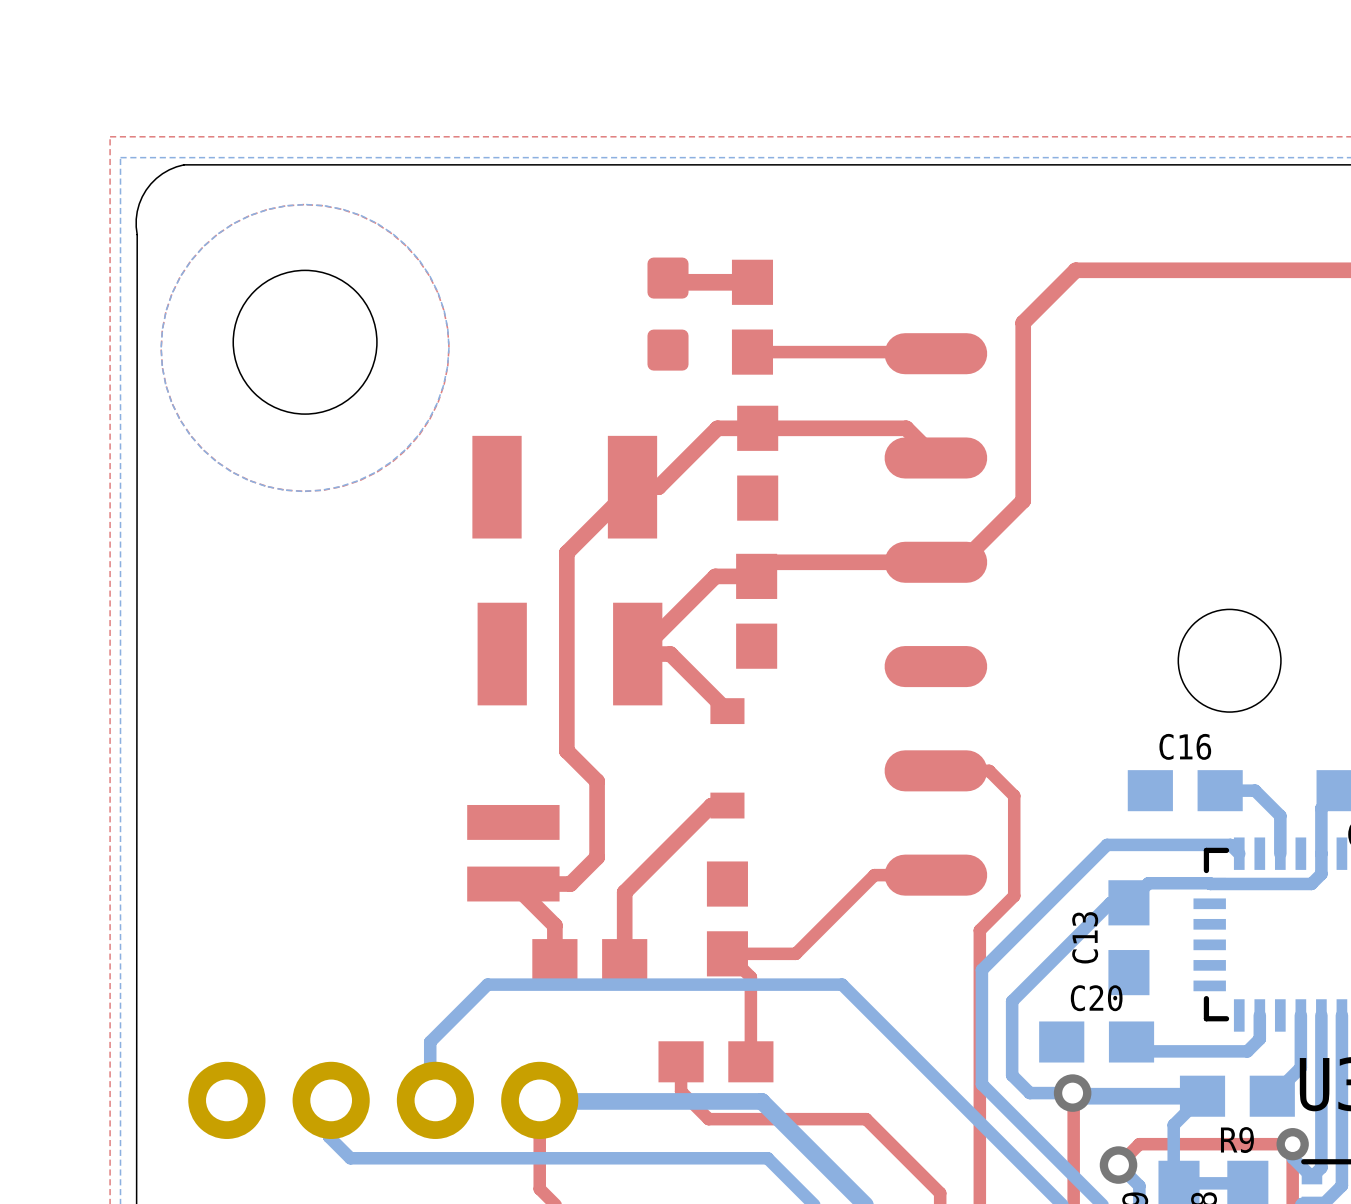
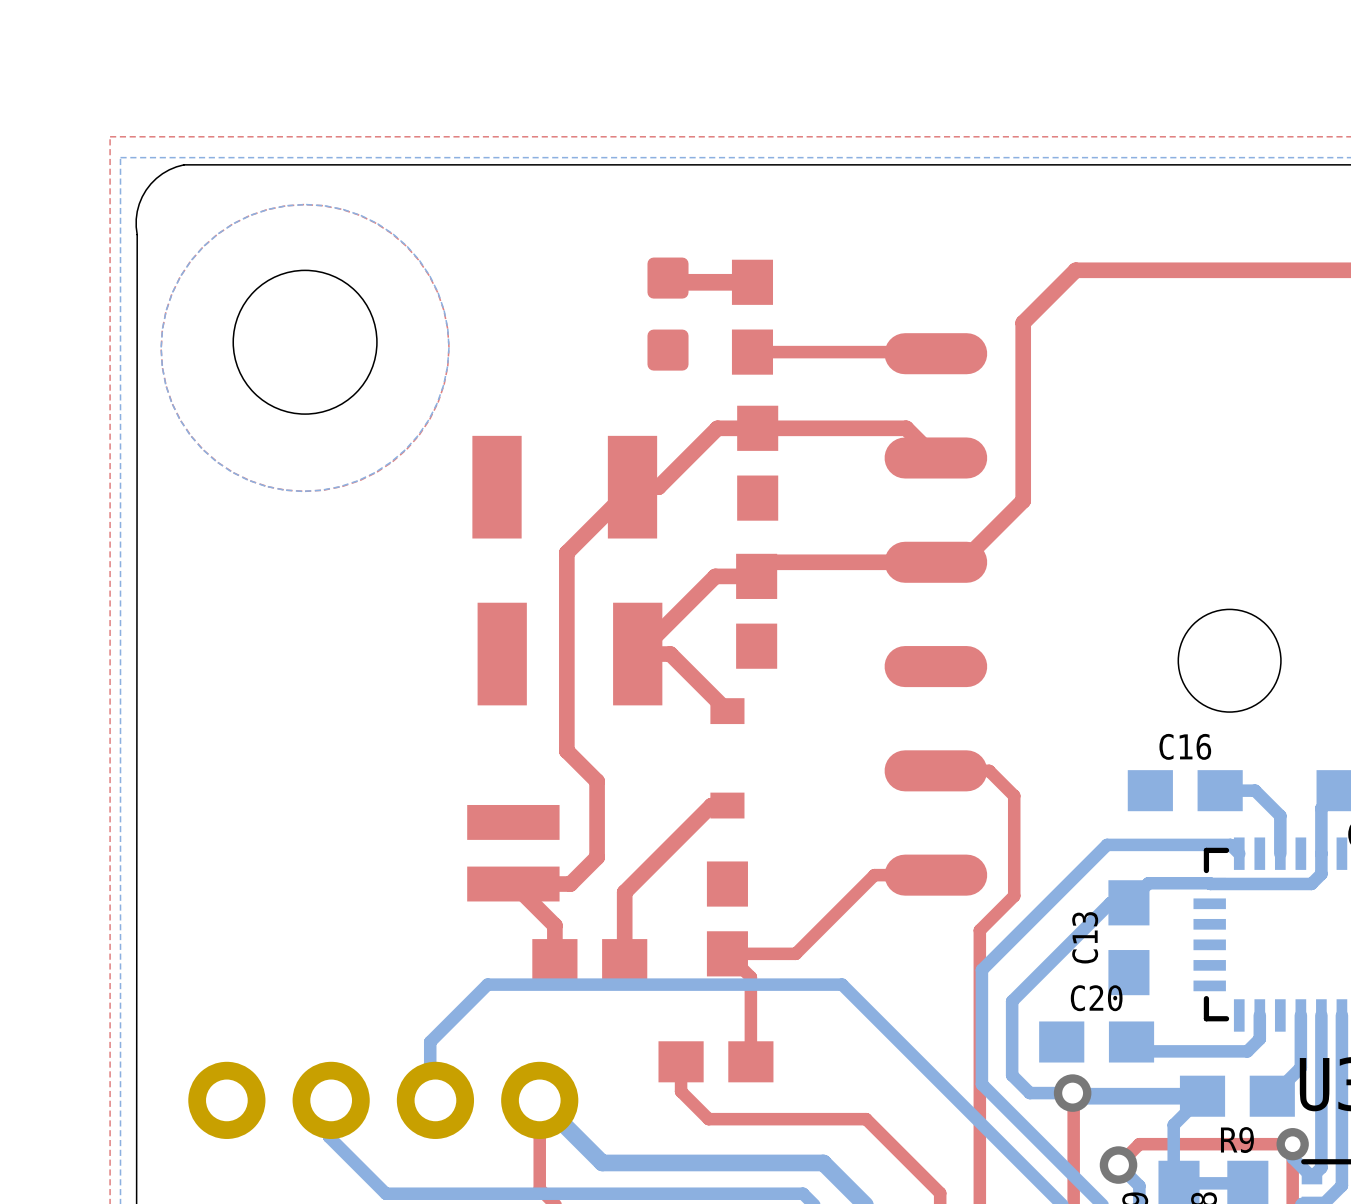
bottom track: (540, 1101) (761, 1101) (823, 1162) -> (540, 1101) (602, 1162) (823, 1162)
bottom track: (350, 1158) (767, 1158) (803, 1193) -> (350, 1158) (385, 1193) (803, 1193)

